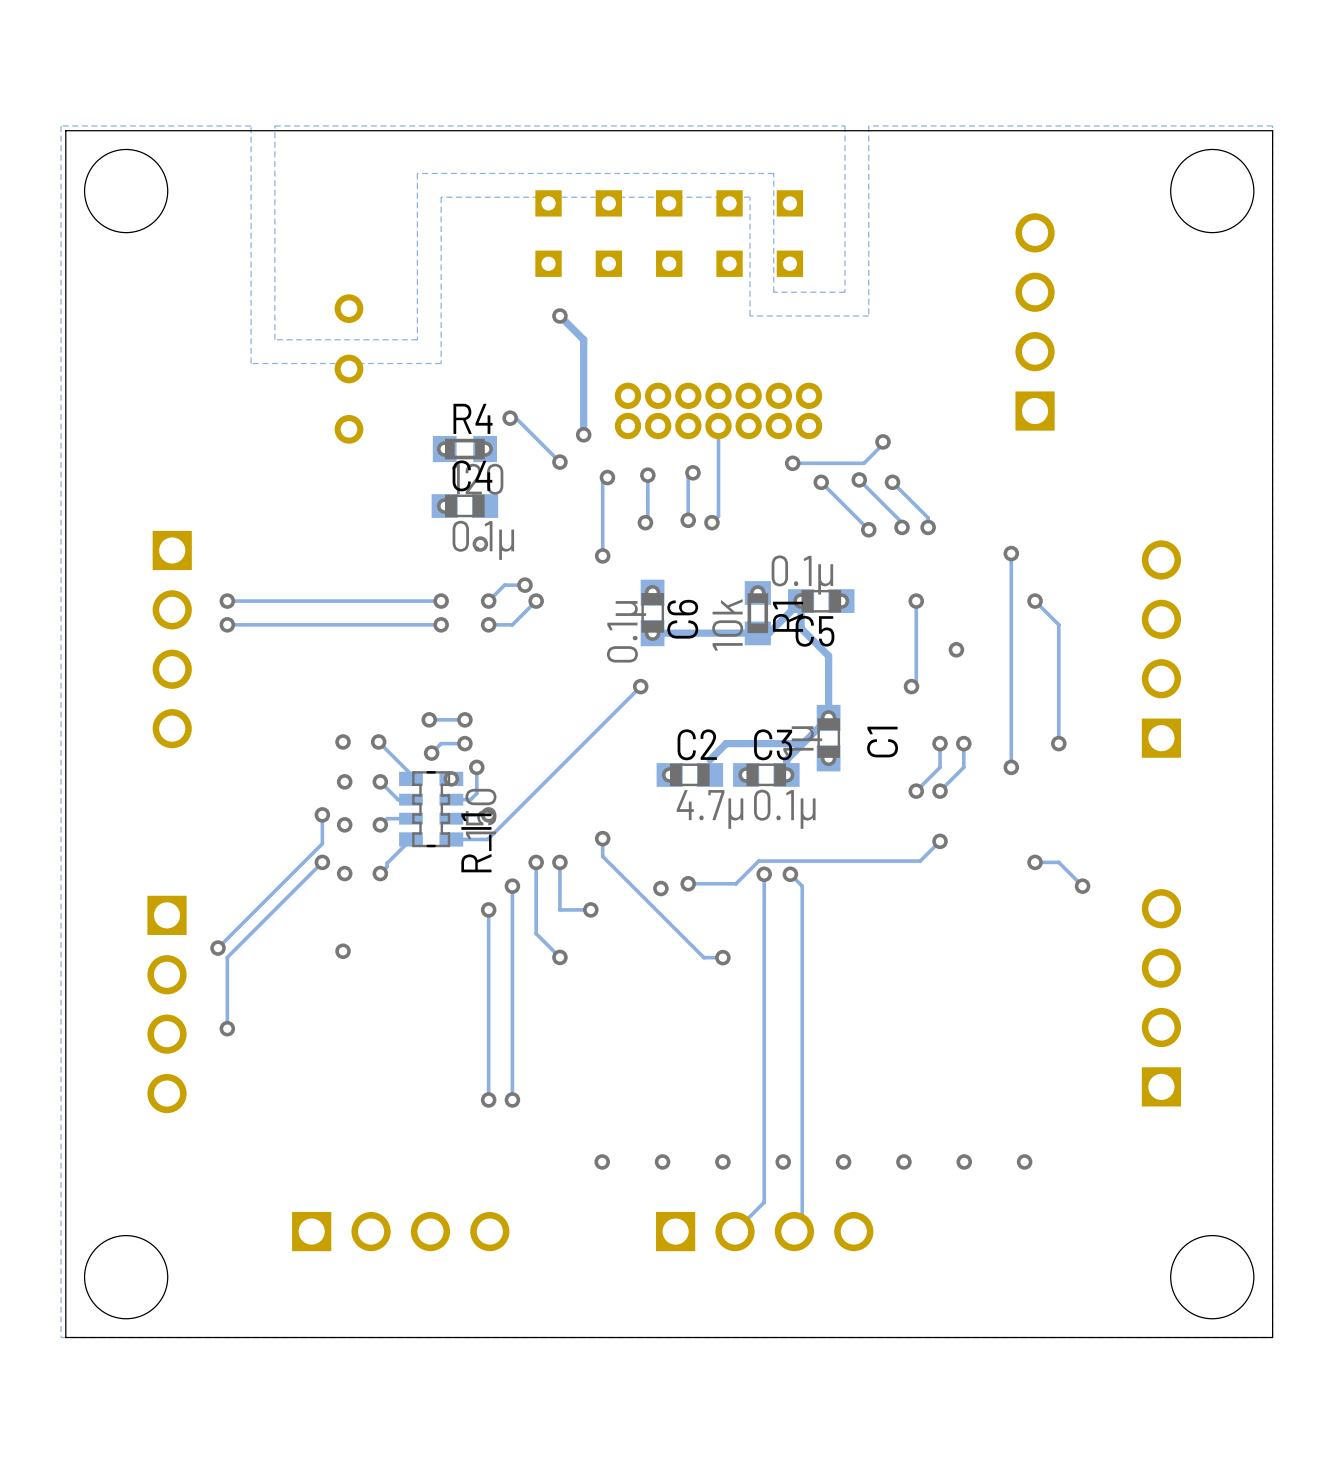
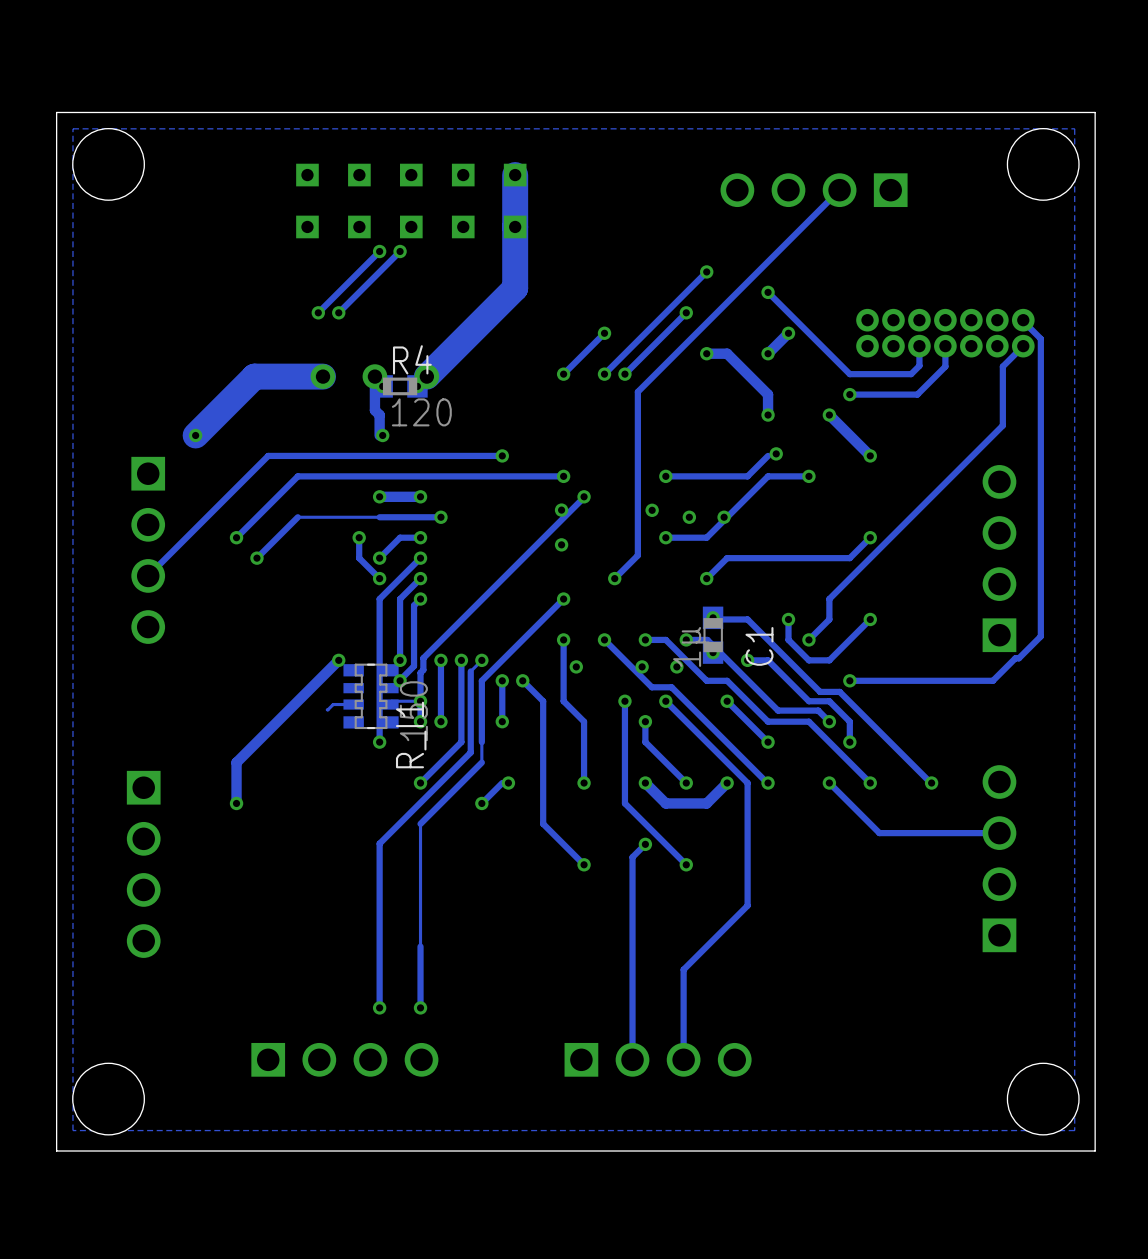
zone outline: (845, 125) (274, 125) (274, 339) (417, 339) (417, 173) (773, 173) (773, 292) (845, 292) (845, 125) -> none
zone outline: (1272, 125) (868, 125) (868, 316) (749, 316) (749, 197) (441, 197) (441, 363) (251, 363) (251, 125) (61, 125) (61, 1337) (1272, 1337) (1272, 125) -> (1074, 128) (1074, 1130) (72, 1130) (72, 128) (1074, 128)
track: none -> (515, 175) (515, 288) (426, 376)
track: none -> (839, 190) (637, 391) (637, 555) (614, 578)
part position: (669, 233) -> (411, 201)
track: none -> (379, 251) (318, 312)
via: none -> (379, 251)
track: none -> (400, 251) (338, 312)
via: none -> (400, 251)
track: (559, 316) (583, 339) (583, 434) -> none
via: (559, 316) -> none
track: none -> (706, 271) (604, 374)
via: none -> (706, 271)
part rotation: 0° (1035, 321) -> 90° counterclockwise (814, 190)
part position: (1035, 321) -> (814, 190)
track: none -> (768, 292) (849, 374) (911, 374) (919, 365) (919, 346)
via: none -> (768, 292)
via: none -> (318, 312)
via: none -> (338, 312)
track: none -> (686, 312) (624, 374)
via: none -> (686, 312)
part rotation: 0° (348, 368) -> 90° clockwise (374, 376)
part position: (348, 368) -> (374, 376)
track: none -> (1023, 320) (1040, 338) (1040, 636) (992, 680) (849, 680)
track: none -> (604, 333) (563, 374)
via: none -> (604, 333)
track: none -> (788, 333) (768, 353)
via: none -> (788, 333)
track: none -> (945, 346) (945, 366) (917, 394) (849, 394)
part position: (718, 410) -> (945, 333)
via: none -> (706, 353)
via: none -> (768, 353)
track: (510, 418) (515, 418) (559, 462) -> none
via: (510, 418) -> none
track: (718, 426) (718, 516) (711, 522) -> none
via: (583, 434) -> none
via: none -> (563, 374)
via: none -> (604, 374)
via: none -> (624, 374)
track: none -> (323, 376) (254, 376) (195, 435)
track: none -> (374, 376) (374, 410) (379, 415) (379, 435)
track: (883, 441) (883, 444) (864, 463) (792, 463) -> none
via: (883, 441) -> none
via: none -> (849, 394)
via: (559, 462) -> none
via: (792, 463) -> none
track: (692, 472) (688, 477) (688, 520) -> none
via: (692, 472) -> none
track: (647, 475) (647, 520) (645, 522) -> none
via: (647, 475) -> none
track: (607, 477) (602, 482) (602, 555) -> none
via: (607, 477) -> none
track: (859, 479) (902, 522) (902, 527) -> none
via: (859, 479) -> none
track: (821, 482) (868, 529) -> (829, 415) (870, 455)
via: (821, 482) -> none
track: (892, 482) (928, 517) (928, 527) -> (768, 415) (768, 394) (727, 353) (706, 353)
via: none -> (829, 415)
via: none -> (195, 435)
C4: 0.1μ (464, 506) -> none
via: (688, 520) -> none
via: (645, 522) -> none
via: (711, 522) -> none
via: (928, 527) -> none
track: none -> (502, 455) (268, 455) (148, 575)
via: none -> (502, 455)
via: (868, 529) -> none
track: none -> (768, 455) (747, 476) (665, 476)
via: (480, 544) -> none
track: none -> (563, 476) (297, 476) (236, 537)
via: none -> (563, 476)
via: none -> (665, 476)
track: none -> (808, 476) (768, 476) (706, 537) (665, 537)
via: none -> (808, 476)
track: (1011, 553) (1011, 767) -> none
via position: (1011, 553) -> (870, 455)
via: (602, 555) -> none
via: none -> (379, 496)
track: none -> (420, 496) (379, 496)
via: none -> (420, 496)
track: none -> (584, 496) (423, 658) (423, 670) (420, 672) (420, 721)
via: none -> (584, 496)
track: (524, 585) (504, 585) (488, 601) -> none
via: (524, 585) -> none
via: (227, 601) -> none
track: (346, 601) (227, 601) -> (297, 517) (256, 558)
via: (441, 601) -> none
via: (488, 601) -> none
track: none -> (440, 517) (379, 517)
via: none -> (440, 517)
track: (536, 601) (512, 624) (488, 624) -> (379, 558) (400, 537) (420, 537)
via: (536, 601) -> none
C5: 0.1μ (821, 601) -> none
track: (916, 601) (916, 681) (911, 686) -> none
via: (916, 601) -> none
track: (1035, 601) (1058, 624) (1058, 743) -> none
via: (1035, 601) -> none
C6: 0.1μ (652, 612) -> none
R1: 10k (757, 613) -> none
via: (227, 624) -> none
via: none -> (236, 537)
track: none -> (359, 537) (359, 558) (379, 578)
via: none -> (359, 537)
track: (441, 624) (227, 624) -> none
via: (441, 624) -> none
via: none -> (665, 537)
track: none -> (870, 537) (849, 558) (727, 558) (706, 578)
via: none -> (870, 537)
track: (757, 633) (652, 633) -> none
track: (757, 633) (768, 633) (801, 601) (801, 628) (828, 655) (828, 717) (786, 760) (786, 774) -> none
via: none -> (256, 558)
via: none -> (379, 558)
track: none -> (420, 558) (379, 599) (379, 742)
via: none -> (420, 558)
via: (956, 649) -> none
via: none -> (379, 578)
track: none -> (420, 578) (400, 599) (400, 660)
via: none -> (420, 578)
via: none -> (614, 578)
via: none -> (706, 578)
track: (640, 686) (559, 767) -> none
via position: (640, 686) -> (563, 599)
via: (911, 686) -> none
track: none -> (420, 599) (414, 605) (414, 666) (400, 680)
via: none -> (420, 599)
via: (429, 719) -> none
track: (464, 719) (429, 719) -> none
via: (464, 719) -> none
track: none -> (706, 619) (747, 619) (820, 691) (839, 691) (931, 783)
via: none -> (788, 619)
track: none -> (870, 619) (829, 660) (808, 660) (788, 639) (788, 619)
via: none -> (870, 619)
via: (343, 741) -> none
track: (378, 741) (410, 774) (410, 778) -> none
via: (378, 741) -> none
track: (464, 743) (441, 743) (431, 753) -> none
via: (464, 743) -> none
track: none -> (563, 639) (563, 701) (584, 721) (584, 783)
via: none -> (563, 639)
track: none -> (604, 639) (651, 687) (671, 687) (768, 783)
via: none -> (604, 639)
track: (749, 743) (726, 743) (710, 759) -> none
via: none -> (645, 639)
track: (773, 743) (797, 743) (800, 746) -> (665, 639) (706, 680) (727, 680) (768, 721) (808, 721) (870, 783)
track: none -> (686, 639) (707, 639) (778, 710) (818, 710) (829, 721)
via: none -> (686, 639)
track: (940, 743) (940, 767) (916, 791) -> (808, 639) (829, 619) (829, 599) (1002, 425) (1002, 366) (1023, 346)
track: (963, 743) (963, 767) (940, 791) -> none
via: (963, 743) -> none
via: (1058, 743) -> none
via: (431, 753) -> none
track: none -> (338, 660) (236, 762) (236, 803)
via: none -> (400, 660)
track: (476, 767) (476, 793) (470, 799) (451, 799) -> none
via: (476, 767) -> none
track: none -> (440, 660) (440, 721)
via: none -> (440, 660)
track: none -> (461, 660) (461, 742) (420, 783)
via: none -> (461, 660)
via: none -> (481, 660)
track: none -> (747, 660) (768, 660) (808, 701) (829, 701) (849, 721) (849, 742)
via: none -> (747, 660)
via: (1011, 767) -> none
C2: 4.7μ (689, 774) -> none
C3: 0.1μ (766, 774) -> none
via: (451, 778) -> none
track: (547, 780) (487, 839) (451, 839) -> (470, 671) (470, 752) (379, 843) (379, 1007)
via: (344, 781) -> none
track: (380, 781) (398, 799) (410, 799) -> none
via position: (380, 781) -> (338, 660)
via: none -> (400, 680)
track: none -> (502, 680) (502, 721)
via: none -> (502, 680)
track: none -> (522, 680) (543, 701) (543, 823) (584, 864)
via: none -> (522, 680)
via: (916, 791) -> none
via: (940, 791) -> none
via: none -> (849, 680)
track: (322, 814) (322, 843) (218, 948) -> none
via: (322, 814) -> none
track: none -> (624, 701) (624, 803) (686, 864)
via: none -> (624, 701)
via: none -> (665, 701)
track: none -> (727, 701) (768, 742)
via: none -> (727, 701)
via: (344, 824) -> none
via: (380, 824) -> none
via: none -> (420, 721)
via: none -> (440, 721)
via: none -> (502, 721)
track: (602, 838) (602, 856) (703, 957) (722, 957) -> none
via: (602, 838) -> none
track: none -> (645, 721) (645, 742) (686, 783)
via: none -> (645, 721)
track: (410, 839) (387, 863) (387, 866) (380, 873) -> none
track: (940, 841) (920, 861) (758, 861) (736, 883) (688, 883) -> none
via position: (940, 841) -> (829, 721)
track: (322, 862) (227, 957) (227, 1028) -> (563, 599) (481, 680) (481, 742)
via: (322, 862) -> none
via: none -> (379, 742)
track: (536, 862) (536, 933) (559, 957) -> none
via: (536, 862) -> none
via: (559, 862) -> none
via: none -> (768, 742)
via: none -> (849, 742)
track: (1035, 862) (1058, 862) (1082, 886) -> none
via: (1035, 862) -> none
via: (344, 873) -> none
via: (380, 873) -> none
track: (764, 874) (764, 1202) (735, 1231) -> (645, 844) (632, 857) (632, 1059)
via: (764, 874) -> none
track: (790, 874) (802, 886) (802, 1223) (794, 1231) -> (665, 701) (747, 783) (747, 905) (683, 969) (683, 1059)
via: (790, 874) -> none
via: (688, 883) -> none
track: (512, 886) (512, 1099) -> none
via: (512, 886) -> none
track: (559, 886) (559, 909) (590, 909) -> none
via position: (1082, 886) -> (931, 783)
via: (660, 888) -> none
track: (488, 909) (488, 957) -> (481, 762) (420, 823)
track: none -> (502, 783) (481, 803)
via: none -> (584, 783)
via: none -> (645, 783)
via: none -> (686, 783)
track: none -> (727, 783) (706, 803) (665, 803) (645, 783)
via: none -> (727, 783)
via: none -> (768, 783)
track: none -> (829, 783) (879, 833) (999, 833)
via: none -> (829, 783)
via: none -> (870, 783)
via: none -> (236, 803)
via: (218, 948) -> none
via: (343, 951) -> none
via position: (559, 957) -> (481, 803)
via: (722, 957) -> none
via: none -> (645, 844)
via: none -> (584, 864)
via: none -> (686, 864)
via: (227, 1028) -> none
track: none -> (420, 946) (420, 1007)
via: (488, 1099) -> none
via: (512, 1099) -> none
via: (602, 1161) -> none
via: (662, 1161) -> none
via: (722, 1161) -> none
via: (783, 1161) -> none
via: (843, 1161) -> none
via: (903, 1161) -> none
via: (964, 1161) -> none
via: (1024, 1161) -> none
via: none -> (379, 1007)
via: none -> (420, 1007)

